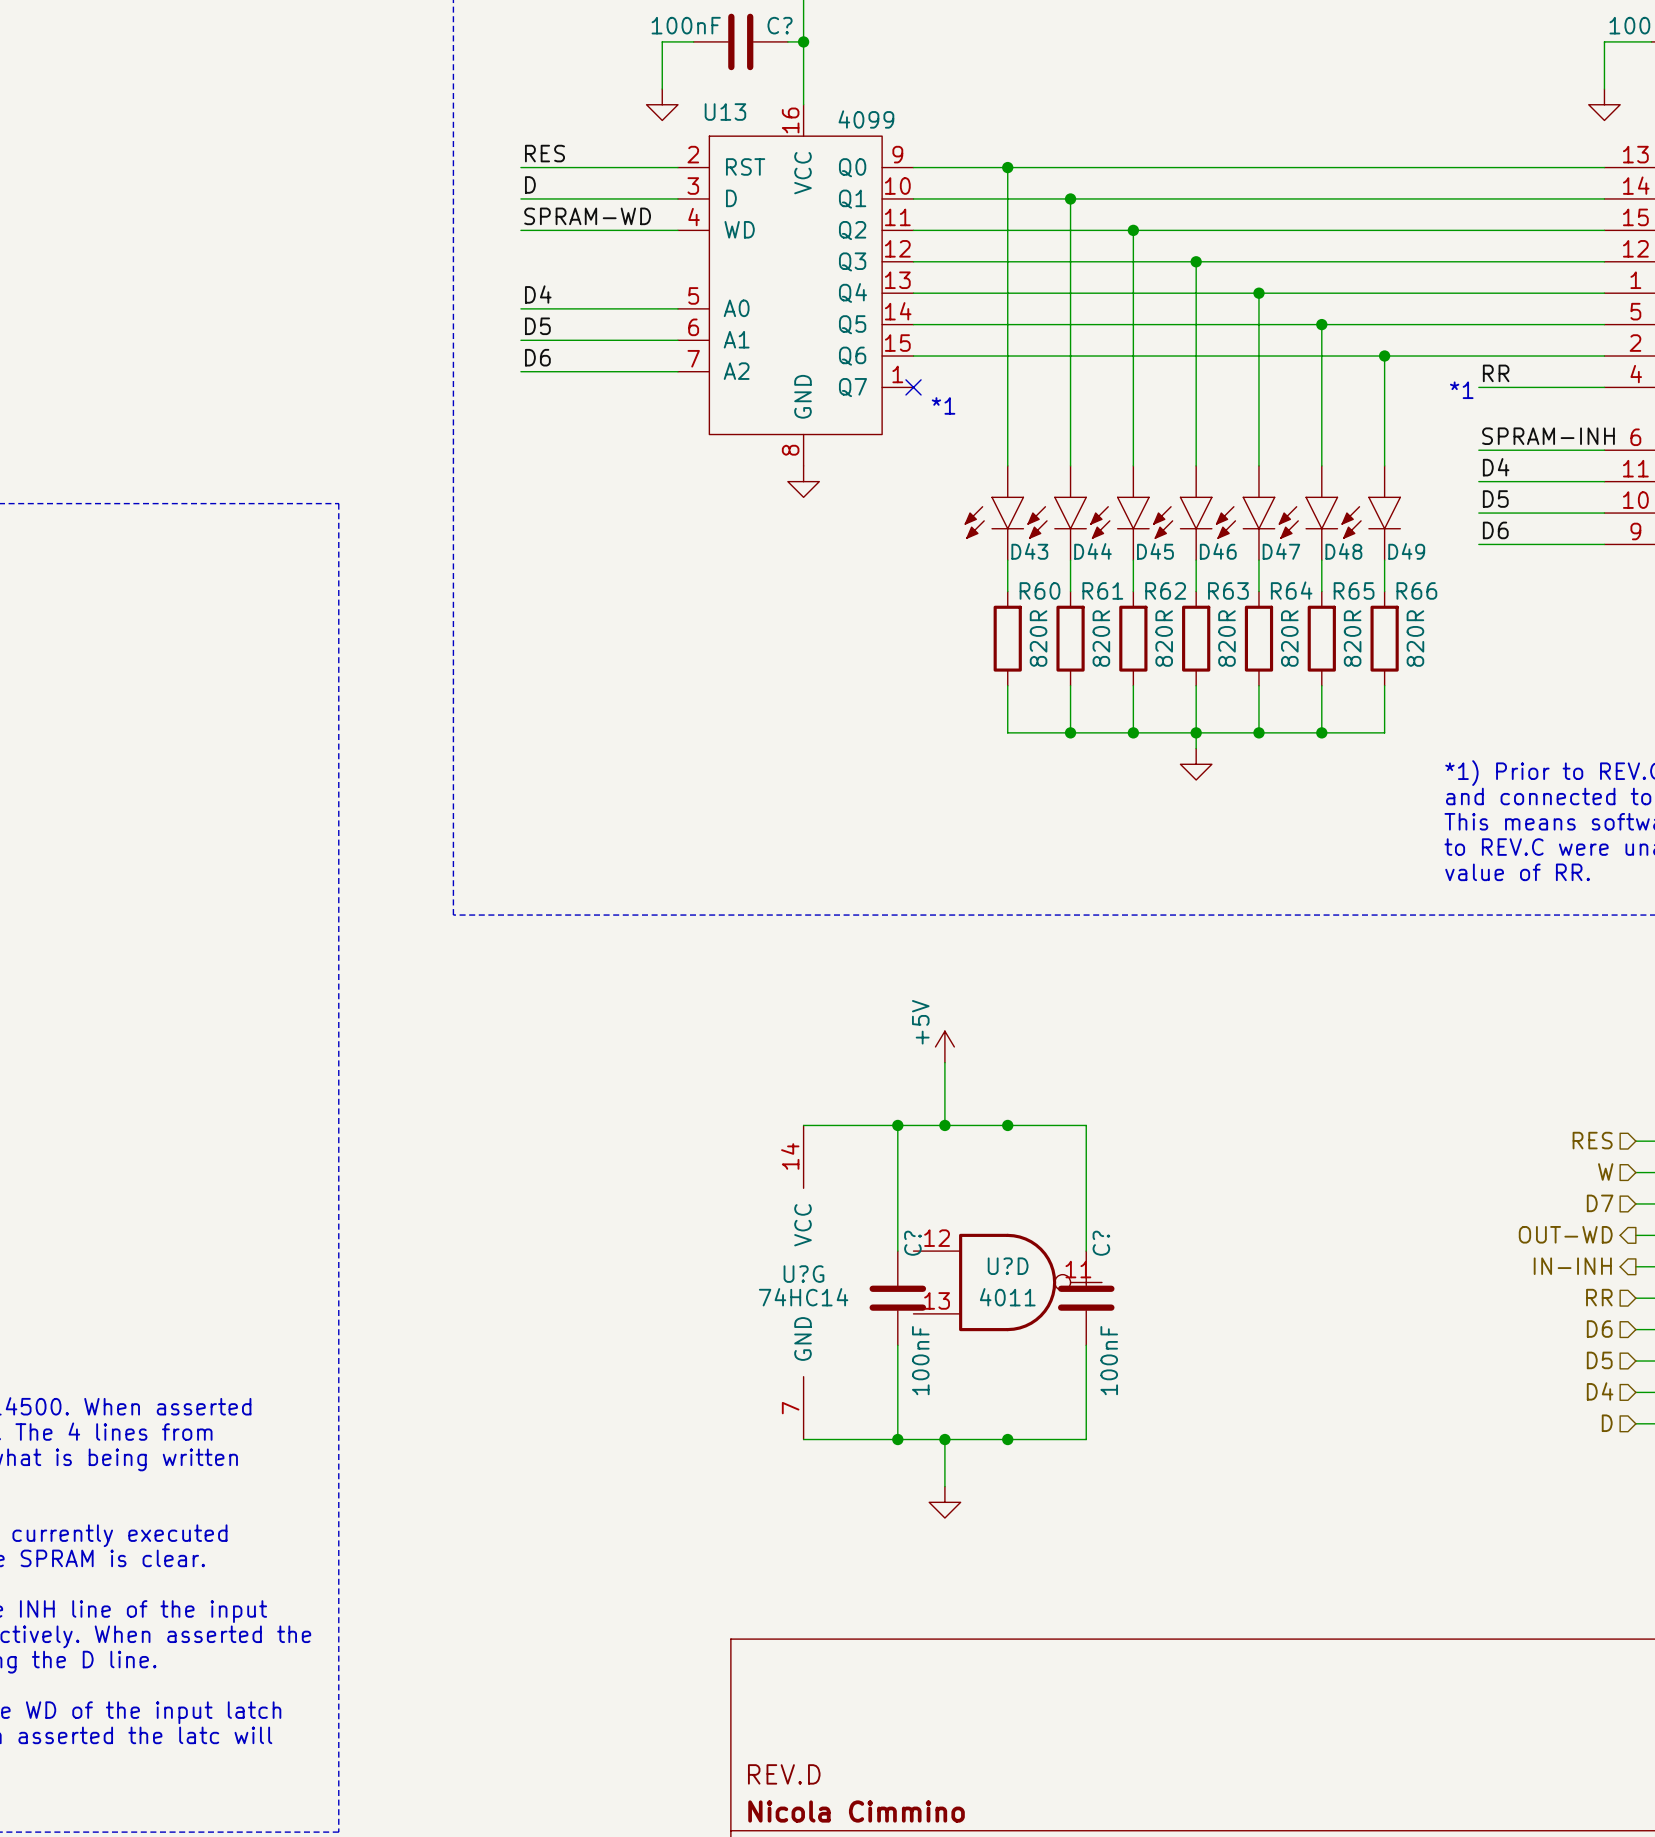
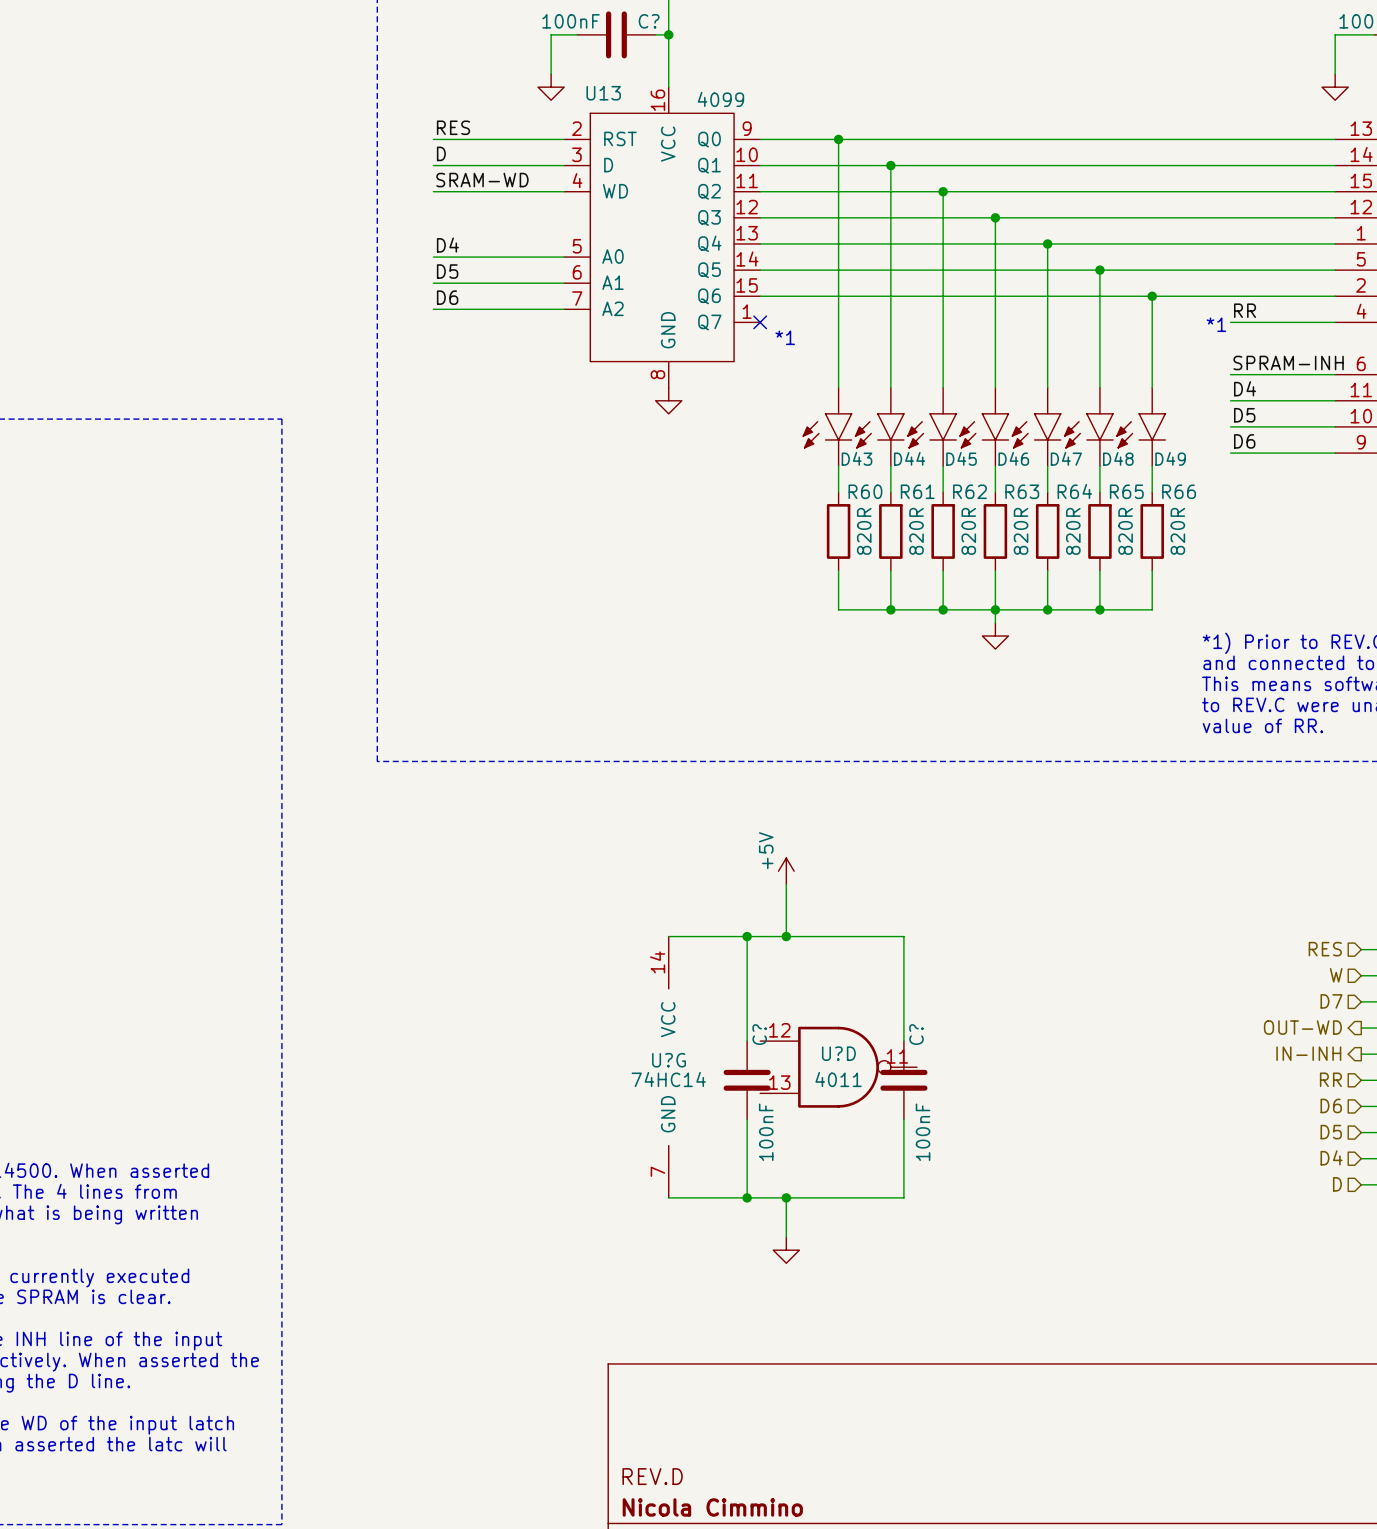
label: SPRAM-WD (587, 216) -> SRAM-WD (482, 180)
junction: (1007, 1125) -> none
junction: (1007, 1439) -> none

